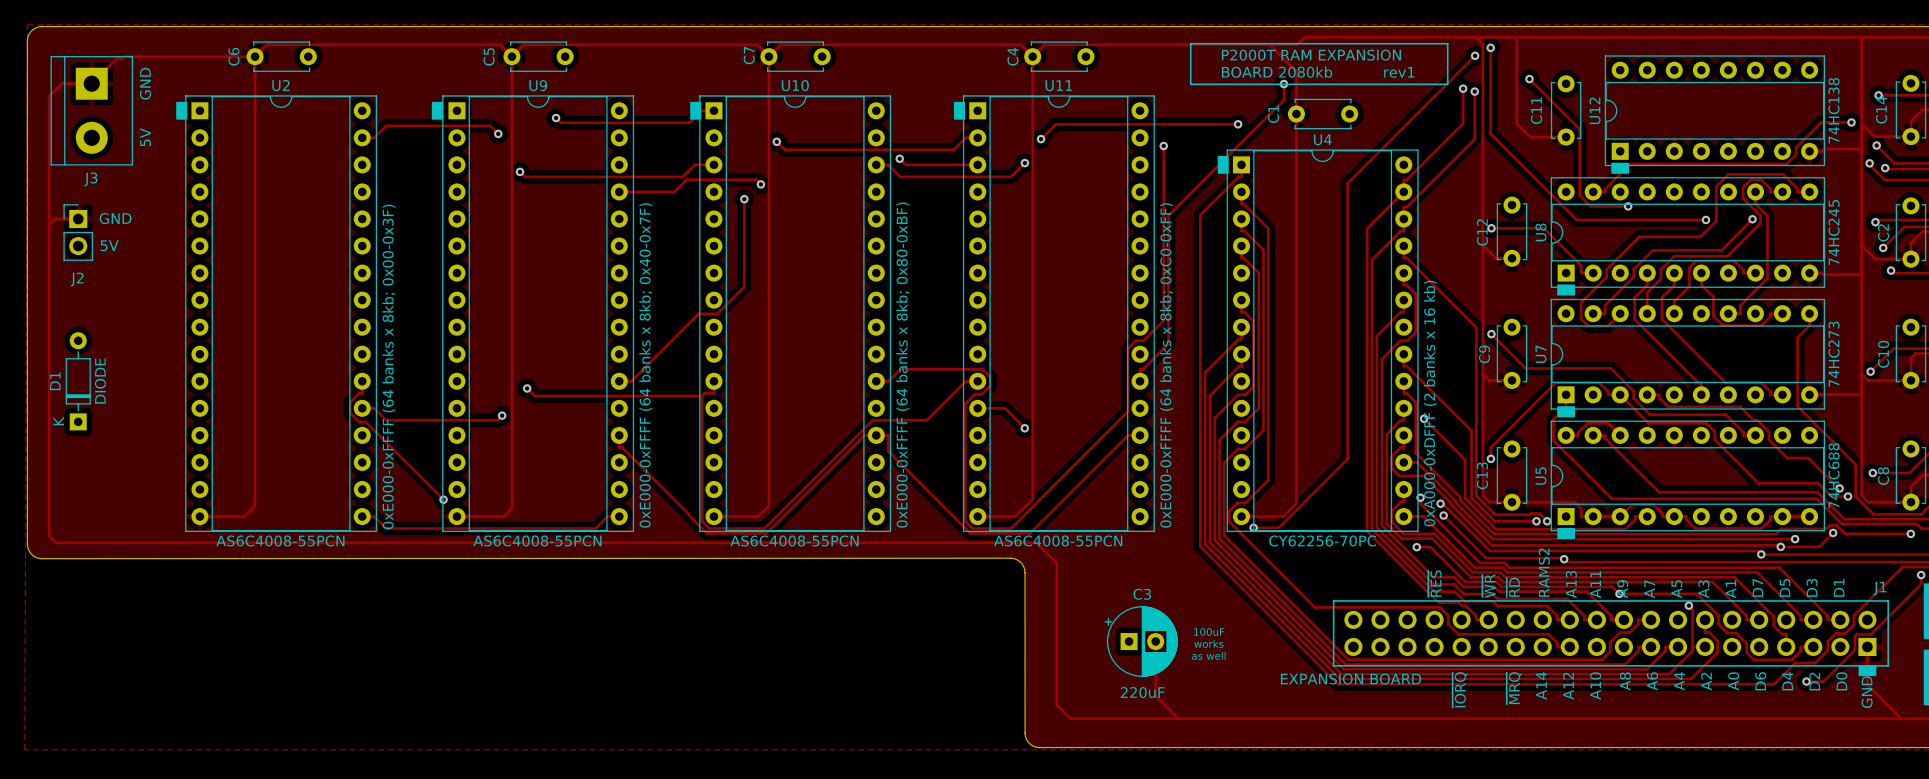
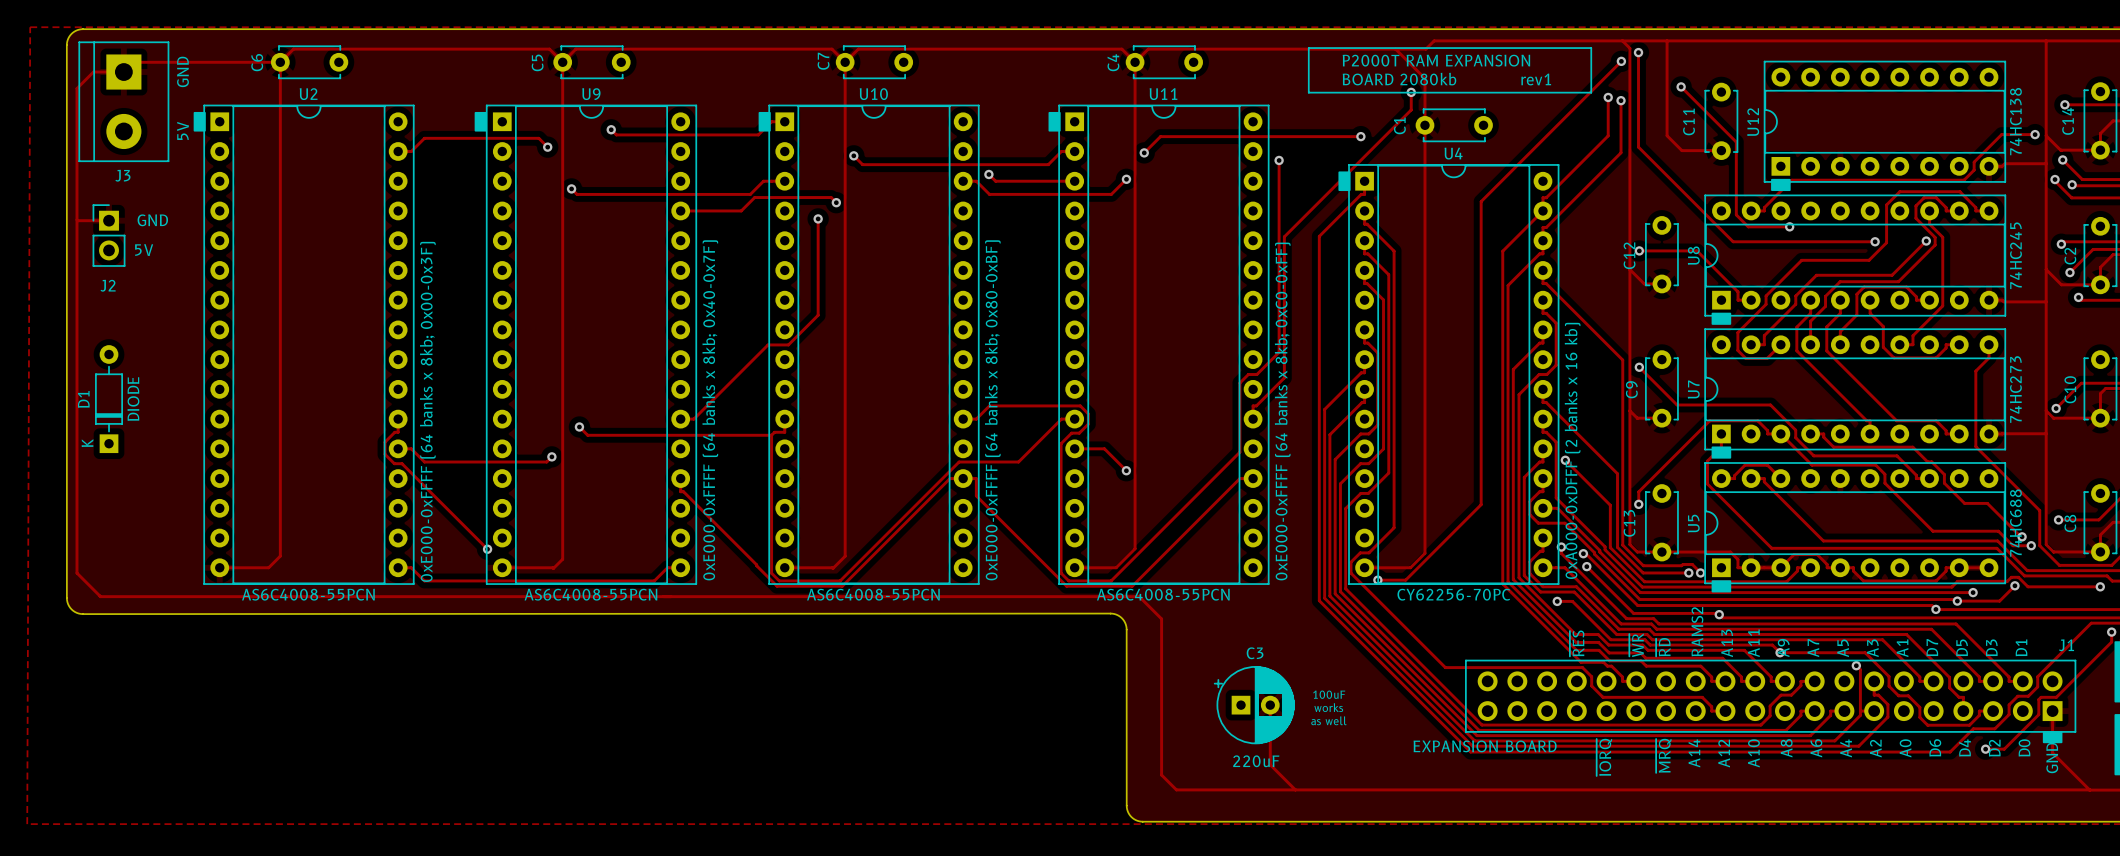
board edge: (75, 26) (37, 27) (29, 33) (27, 41) (27, 545) (31, 554) (38, 558) (75, 558) -> (82, 29) (71, 33) (66, 45) (66, 598) (71, 609) (82, 614)
track: (124, 56) (117, 58) (91, 83) (62, 82) (49, 96) (49, 536) (55, 542) (91, 542) -> (136, 62) (133, 62) (123, 72) (93, 72) (76, 88) (76, 573) (100, 596)
text position: GND (145, 83) -> GND (182, 71)
J3 position: (91, 110) -> (123, 101)
text position: 5V (145, 137) -> 5V (182, 130)
track: none -> (76, 219) (109, 220)
track: (78, 218) (55, 218) (49, 224) -> none
text position: GND (115, 218) -> GND (152, 220)
J2 position: (78, 232) -> (109, 235)
text position: 5V (109, 245) -> 5V (144, 250)
D1 position: (78, 381) -> (109, 399)

